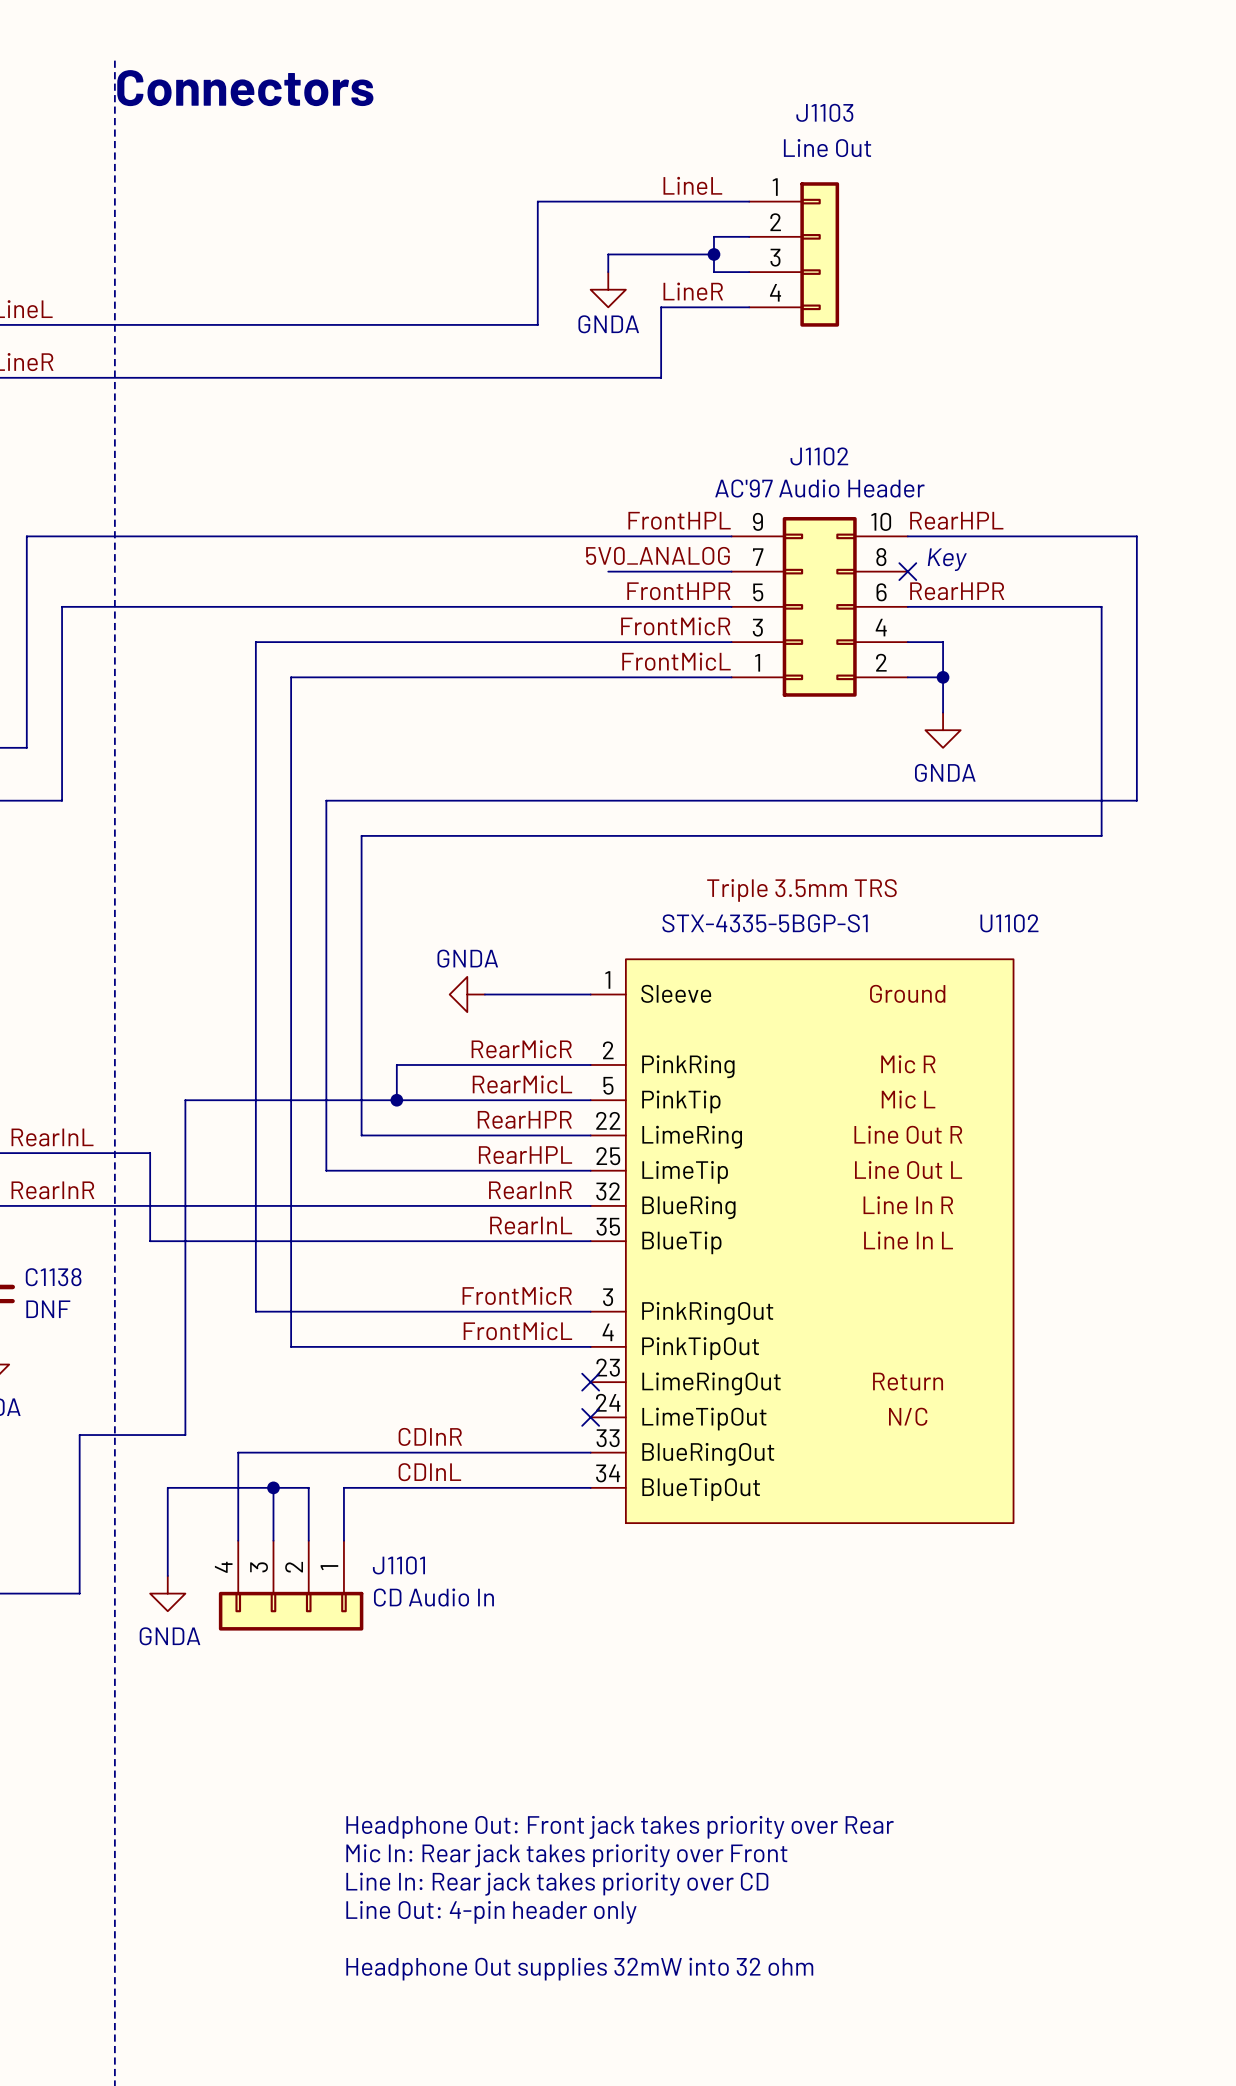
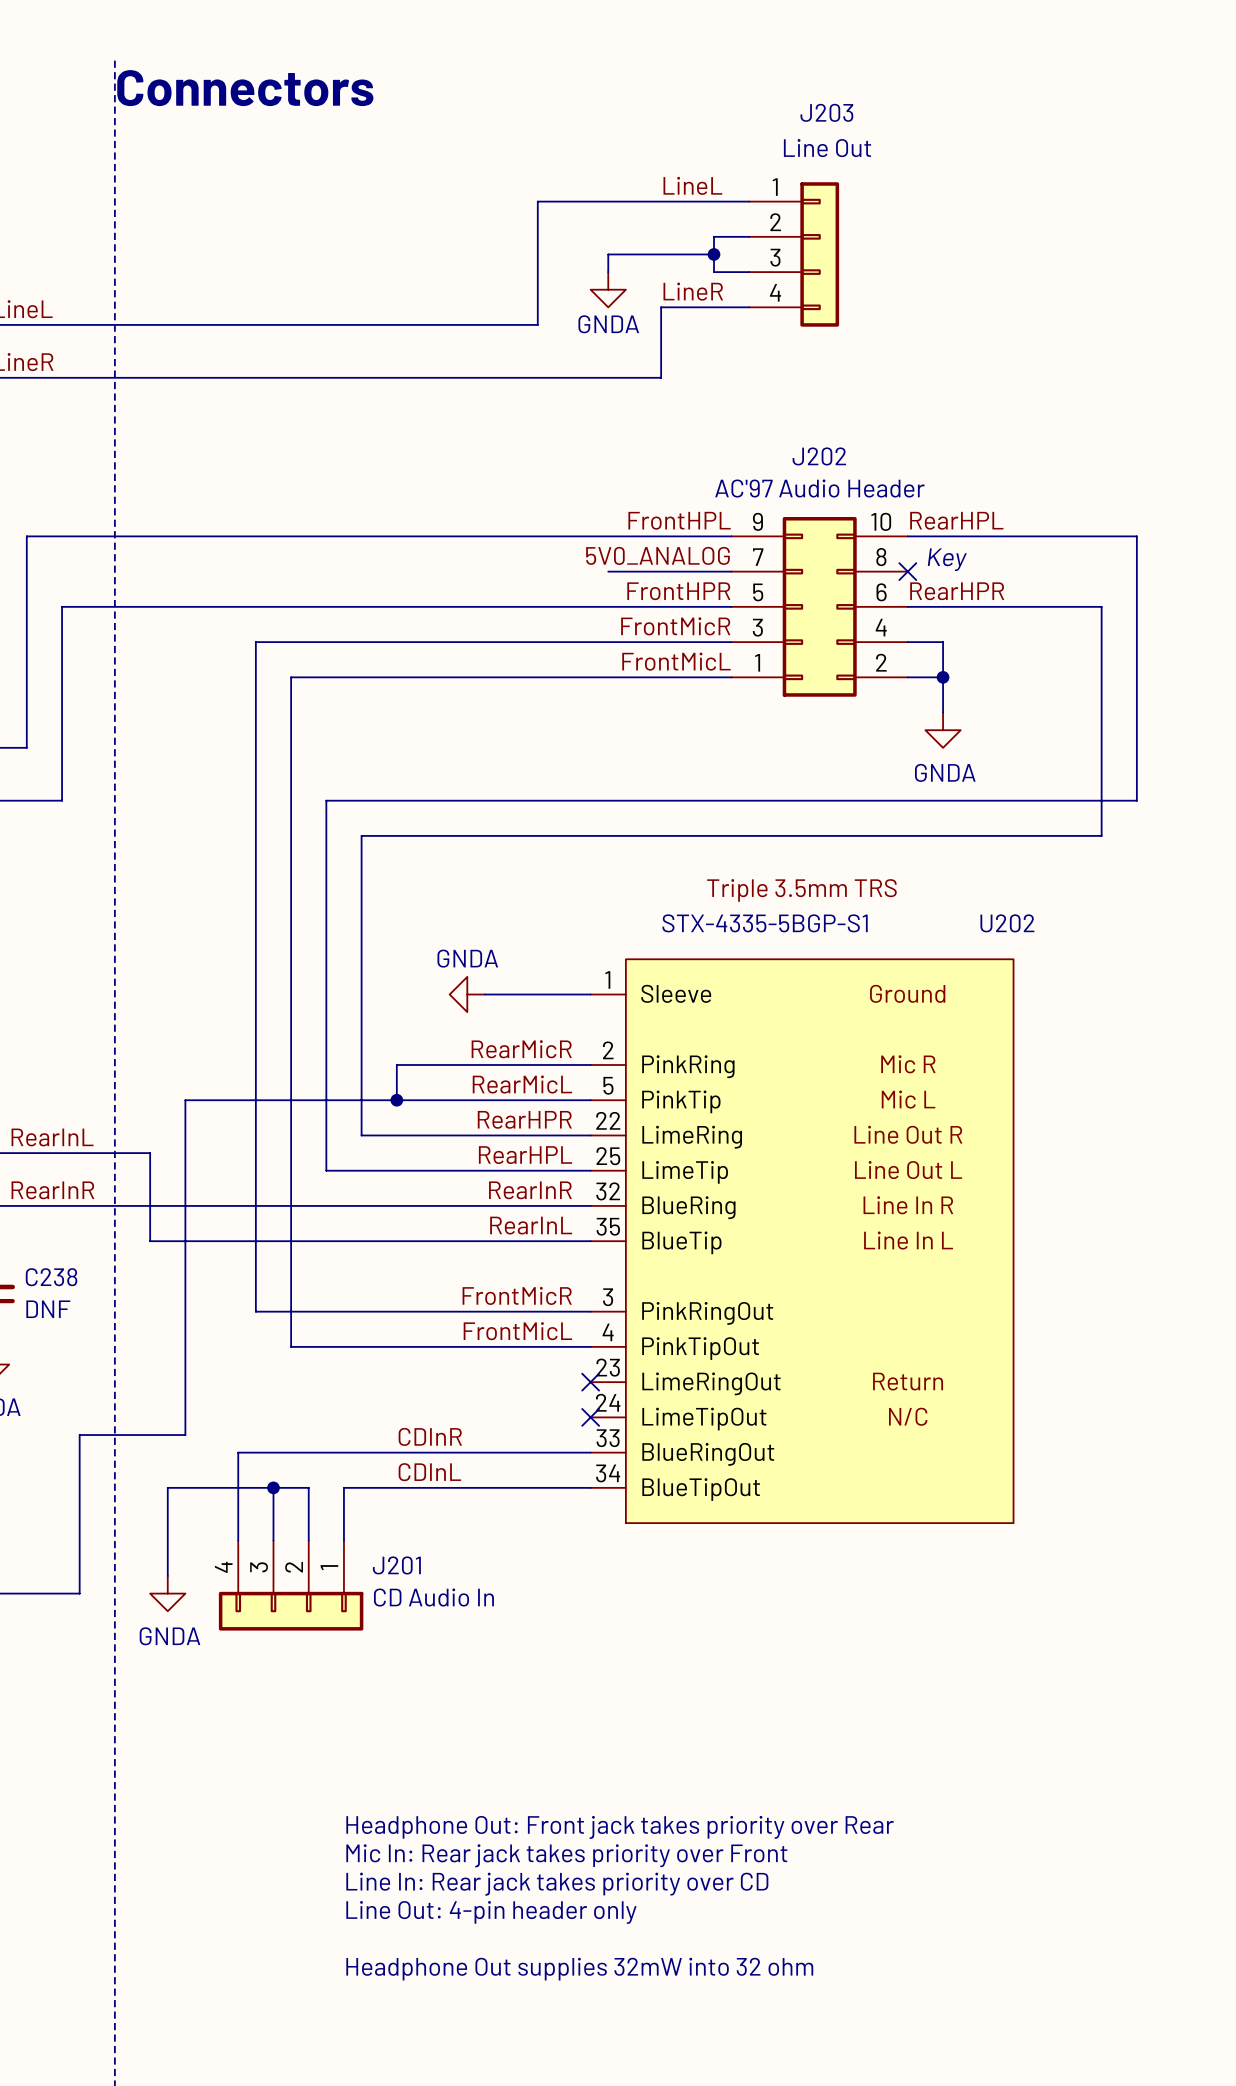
J1103 name: J1103 (824, 112) -> J203 (826, 112)
J1102 name: J1102 (819, 456) -> J202 (819, 456)
U1102 name: U1102 (1009, 923) -> U202 (1007, 923)
C1138 name: C1138 (53, 1277) -> C238 (51, 1277)
J1101 name: J1101 (398, 1565) -> J201 (396, 1565)

